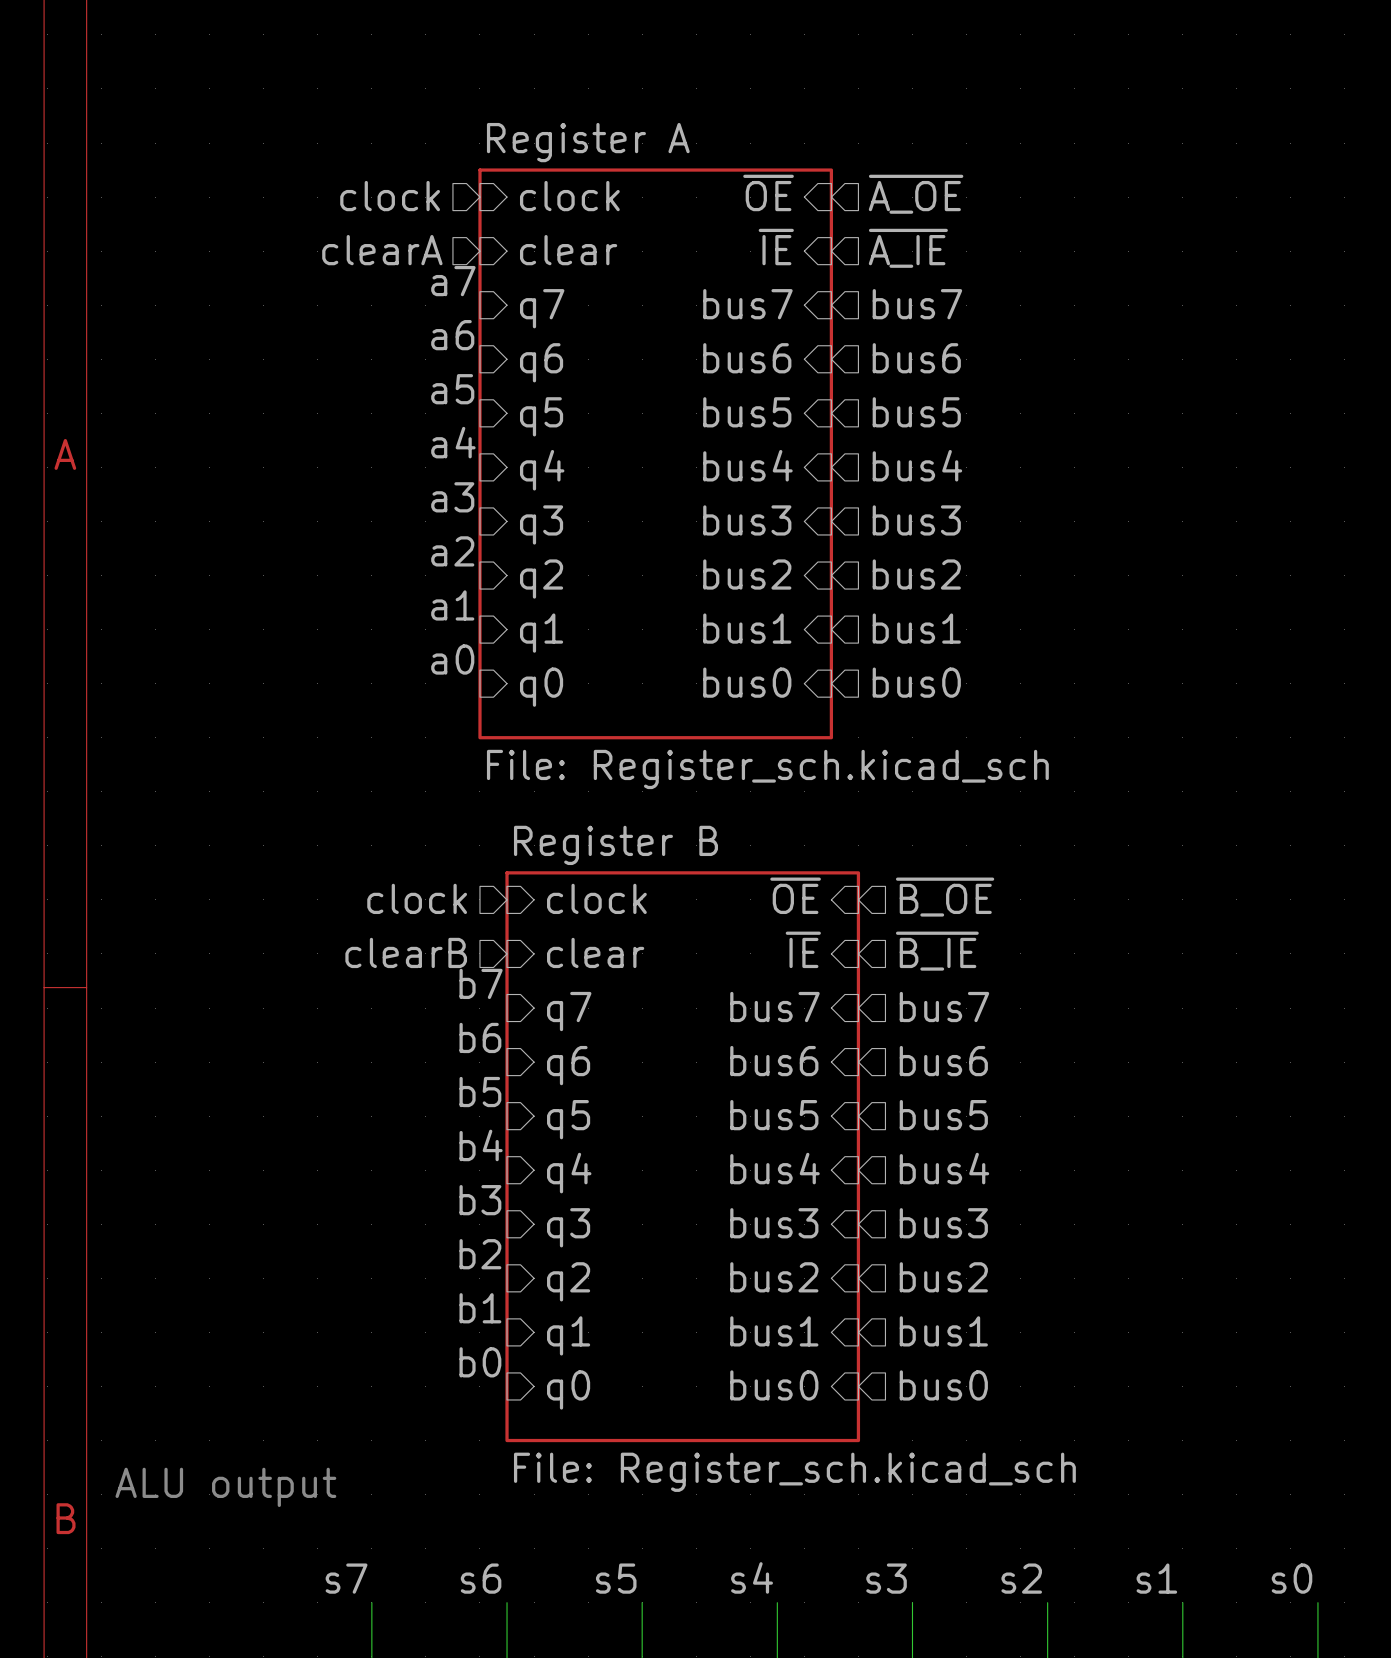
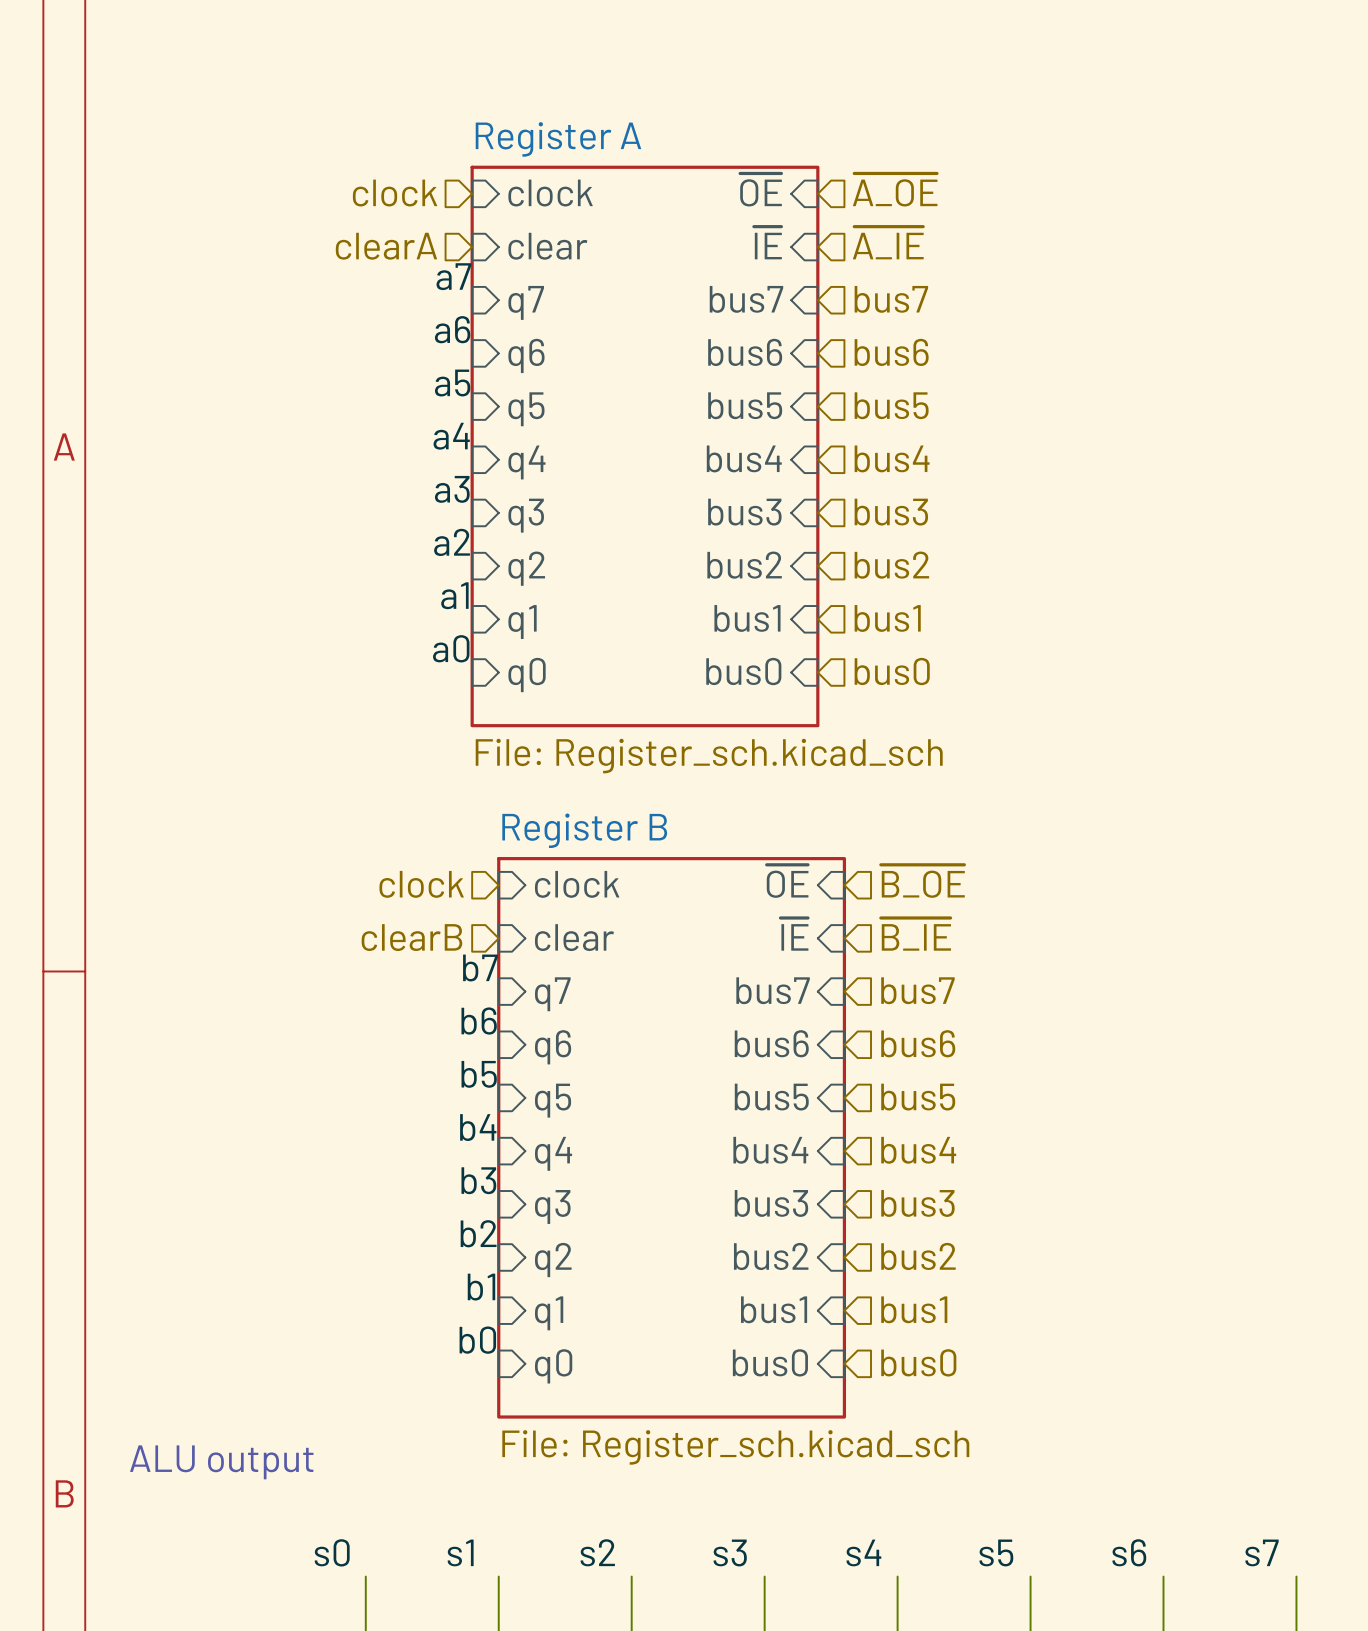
label position: s4 (752, 1577) -> s4 (863, 1552)
label: none -> s0 (332, 1552)
label: s7 (346, 1578) -> none
label: none -> s1 (460, 1552)
label: s6 (481, 1578) -> none
label position: s5 (616, 1578) -> s5 (996, 1552)
label position: s3 (886, 1578) -> s3 (730, 1552)
label position: s2 (1021, 1578) -> s2 (597, 1552)
label: none -> s6 (1129, 1552)
label: s1 (1156, 1578) -> none
label: none -> s7 (1262, 1552)
label: s0 (1292, 1578) -> none

